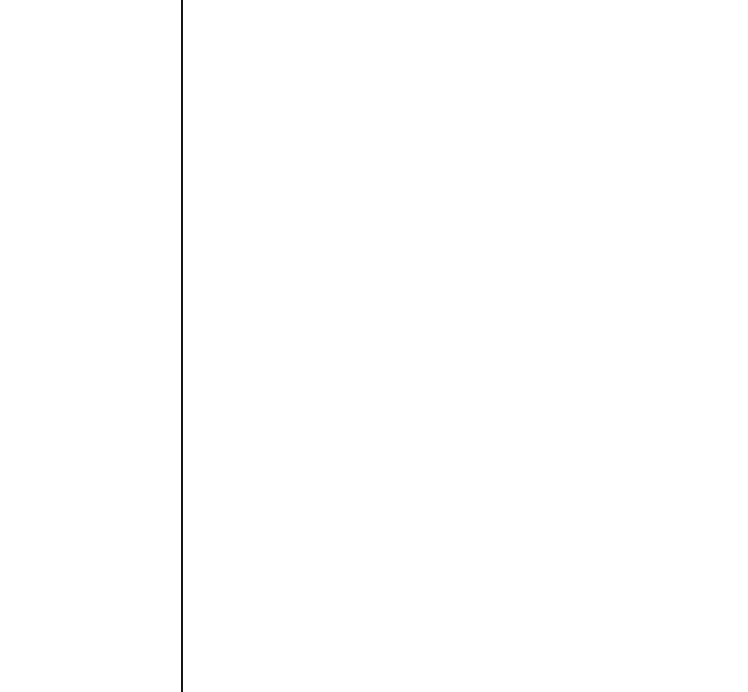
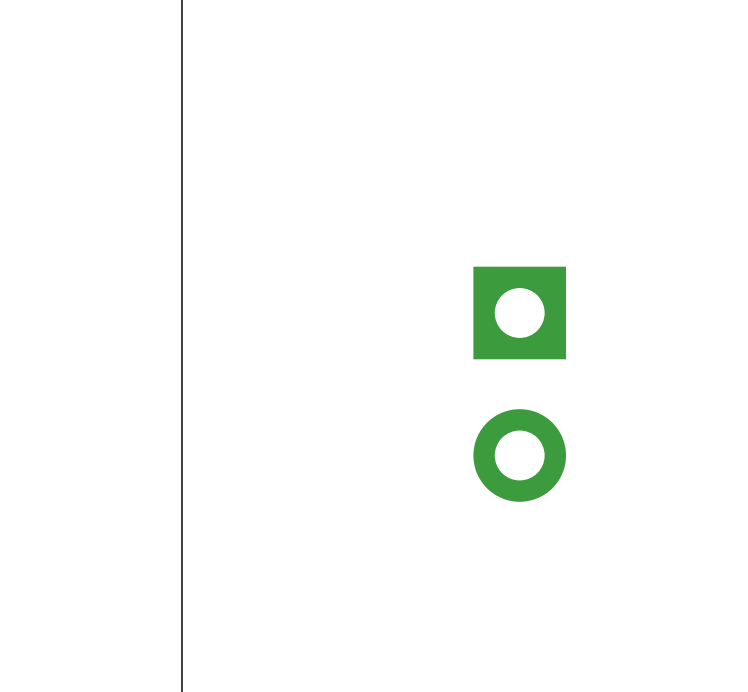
part: none -> (519, 384)

